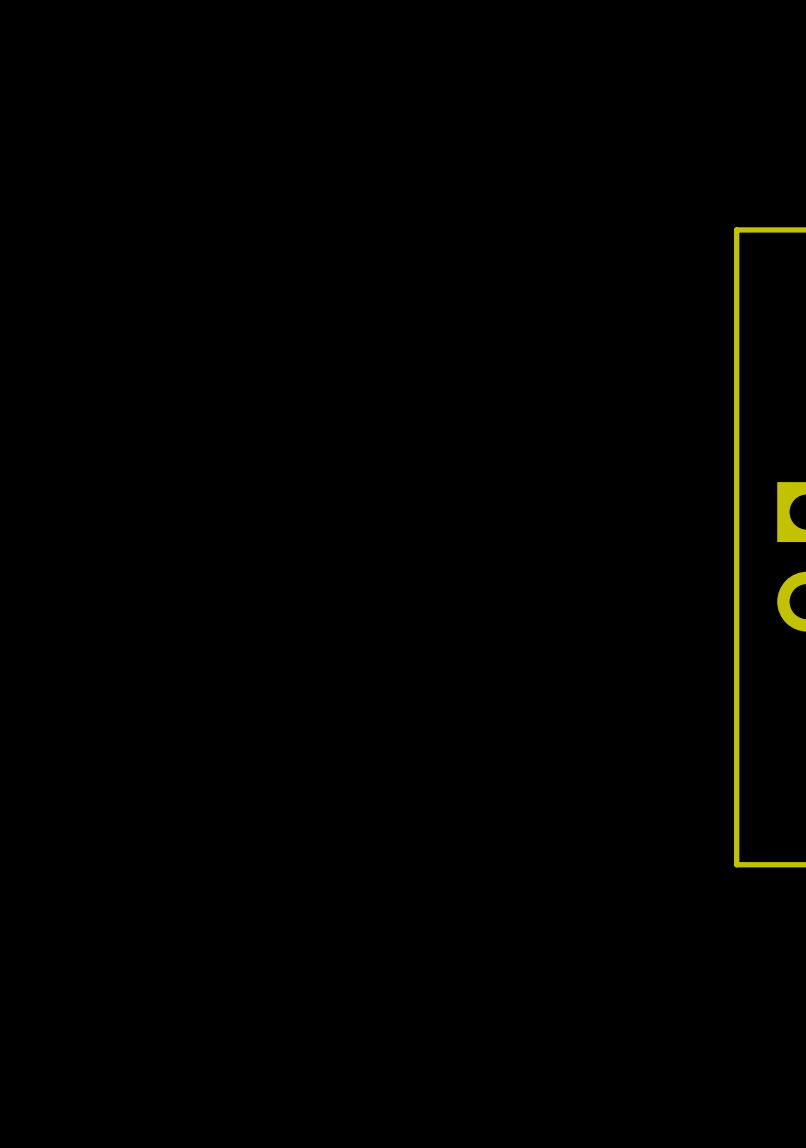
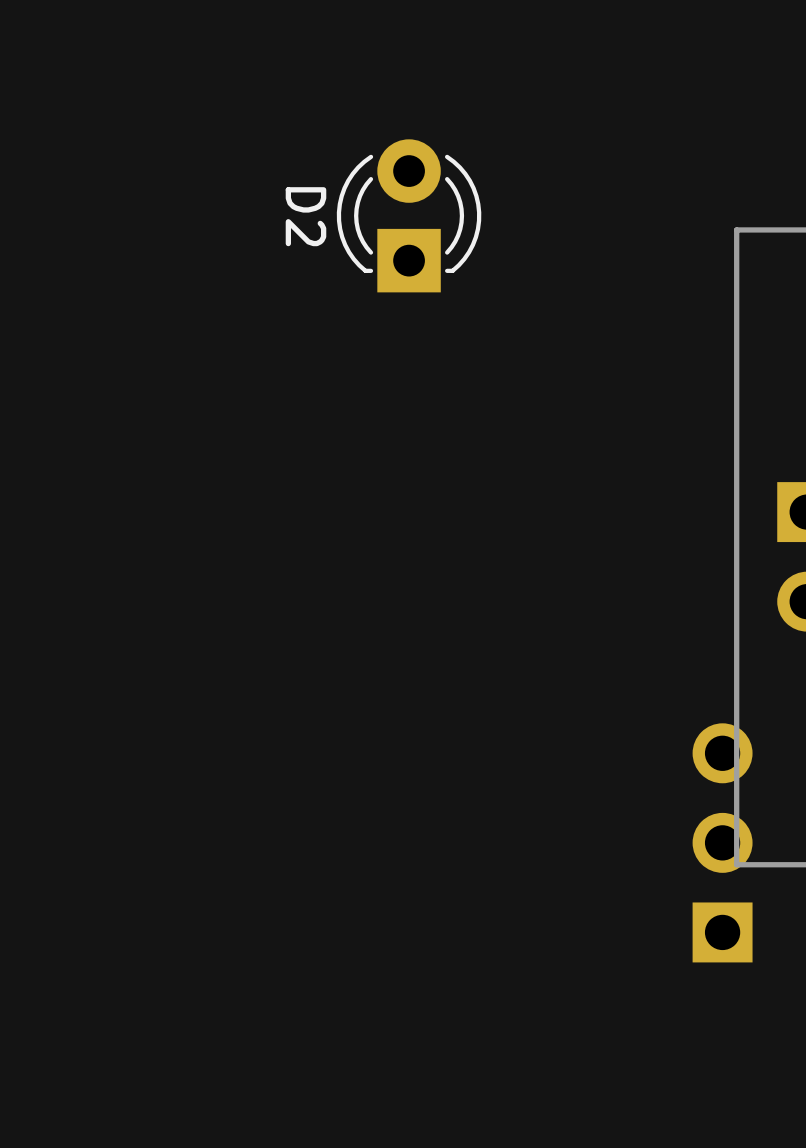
D2: none -> (409, 215)
part: none -> (722, 842)

